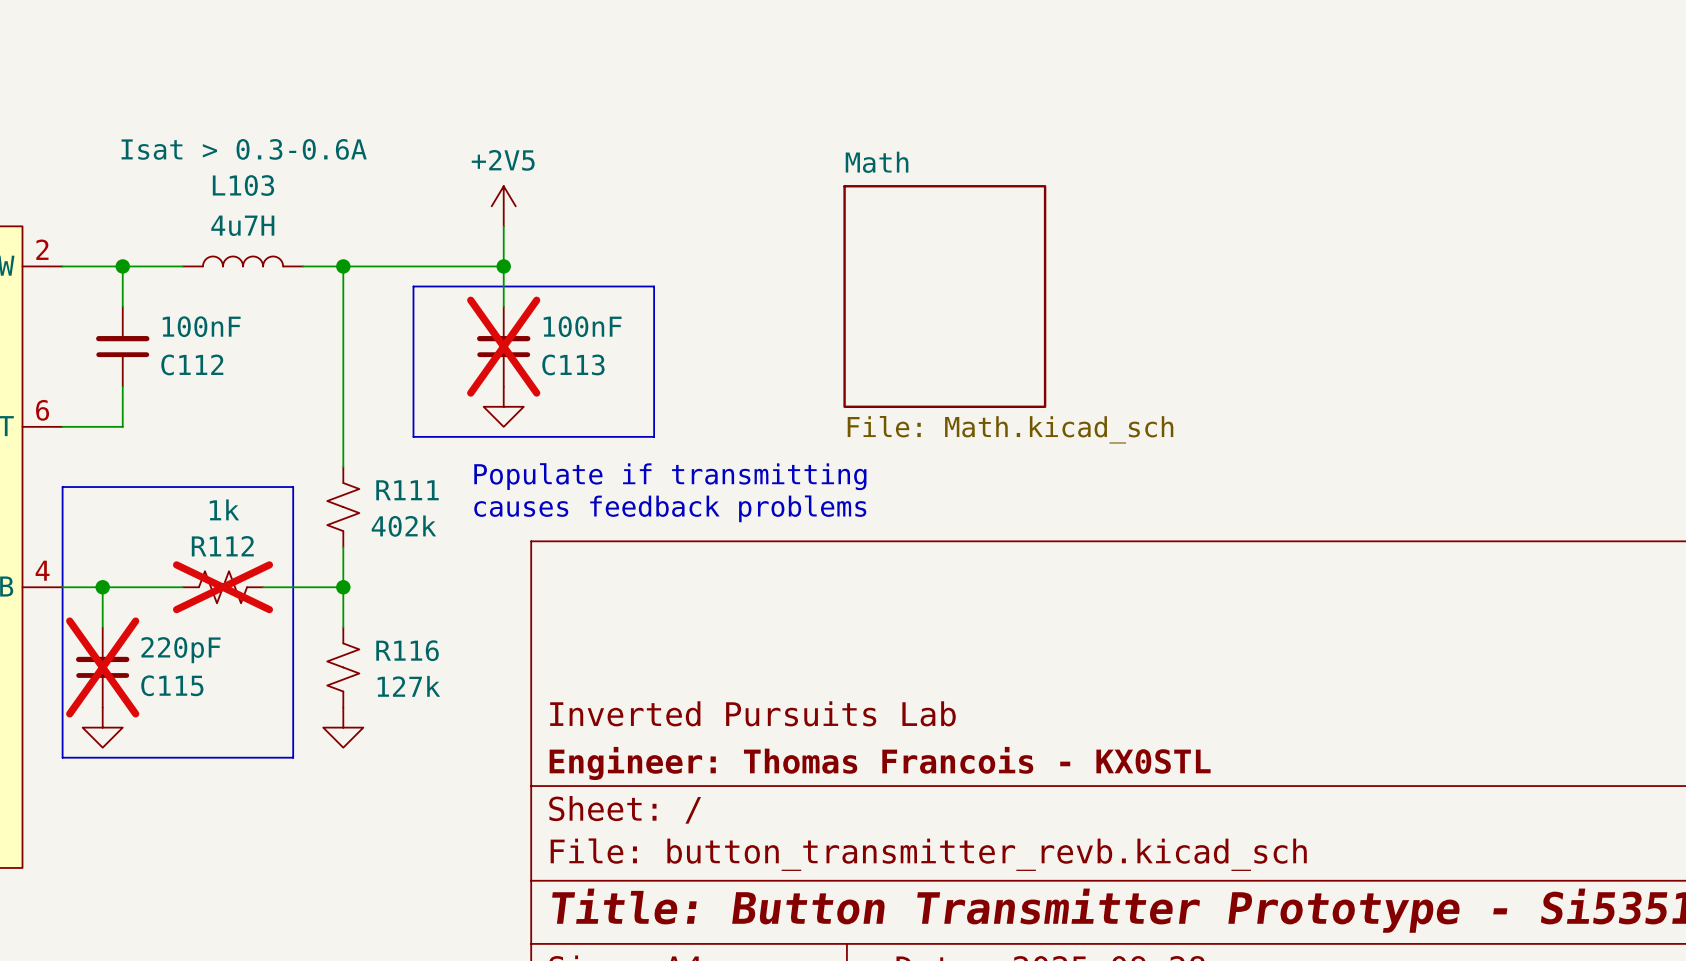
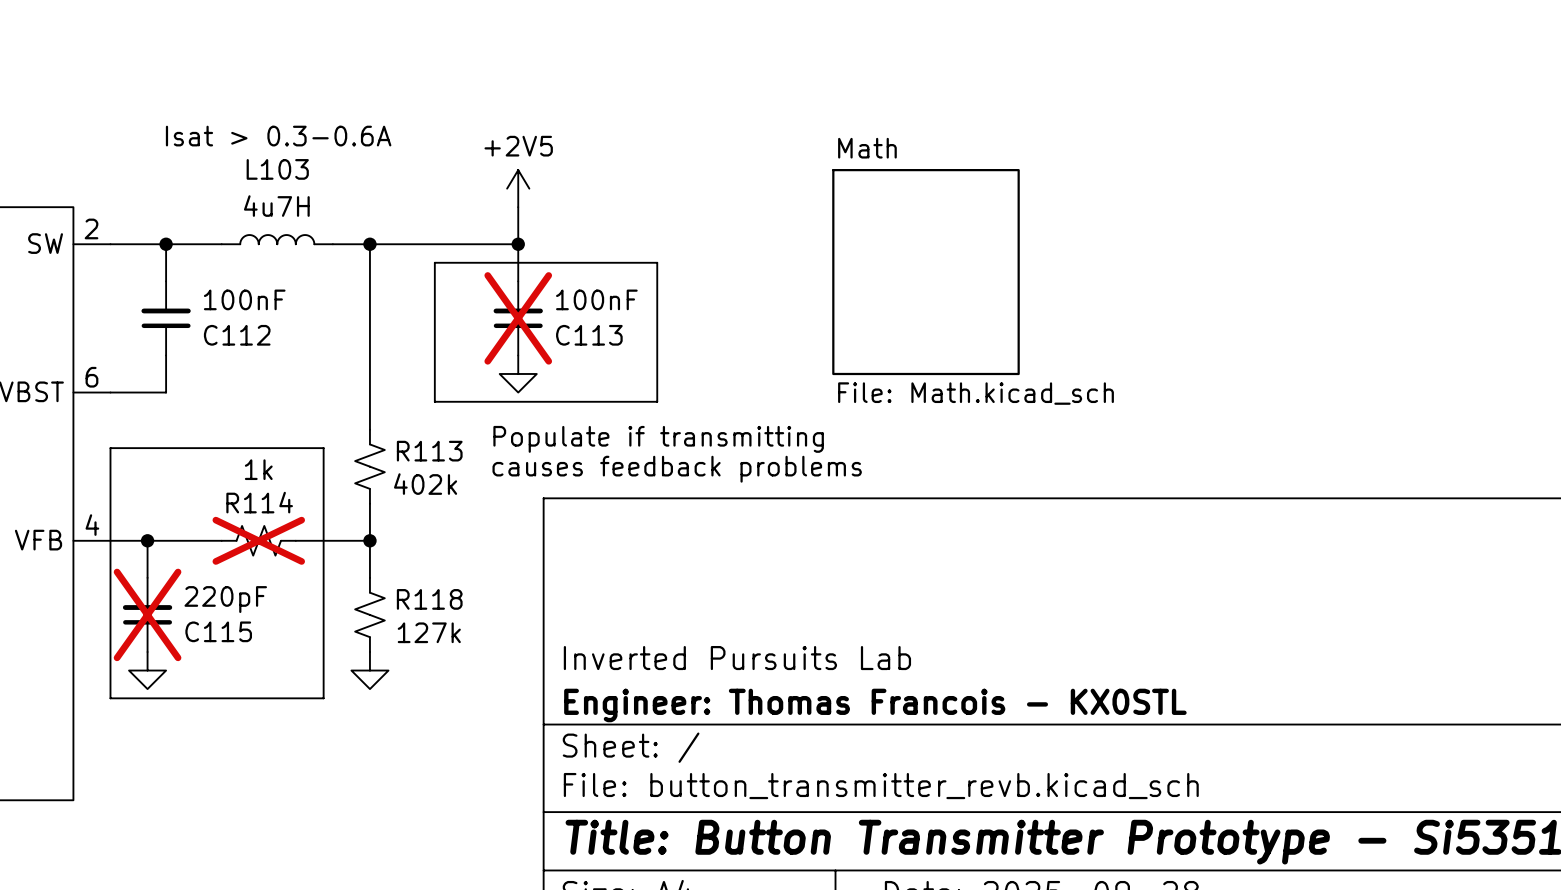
R111 name: R111 (407, 490) -> R113 (429, 451)
R112 name: R112 (222, 546) -> R114 (259, 502)
R116 name: R116 (407, 650) -> R118 (429, 599)

